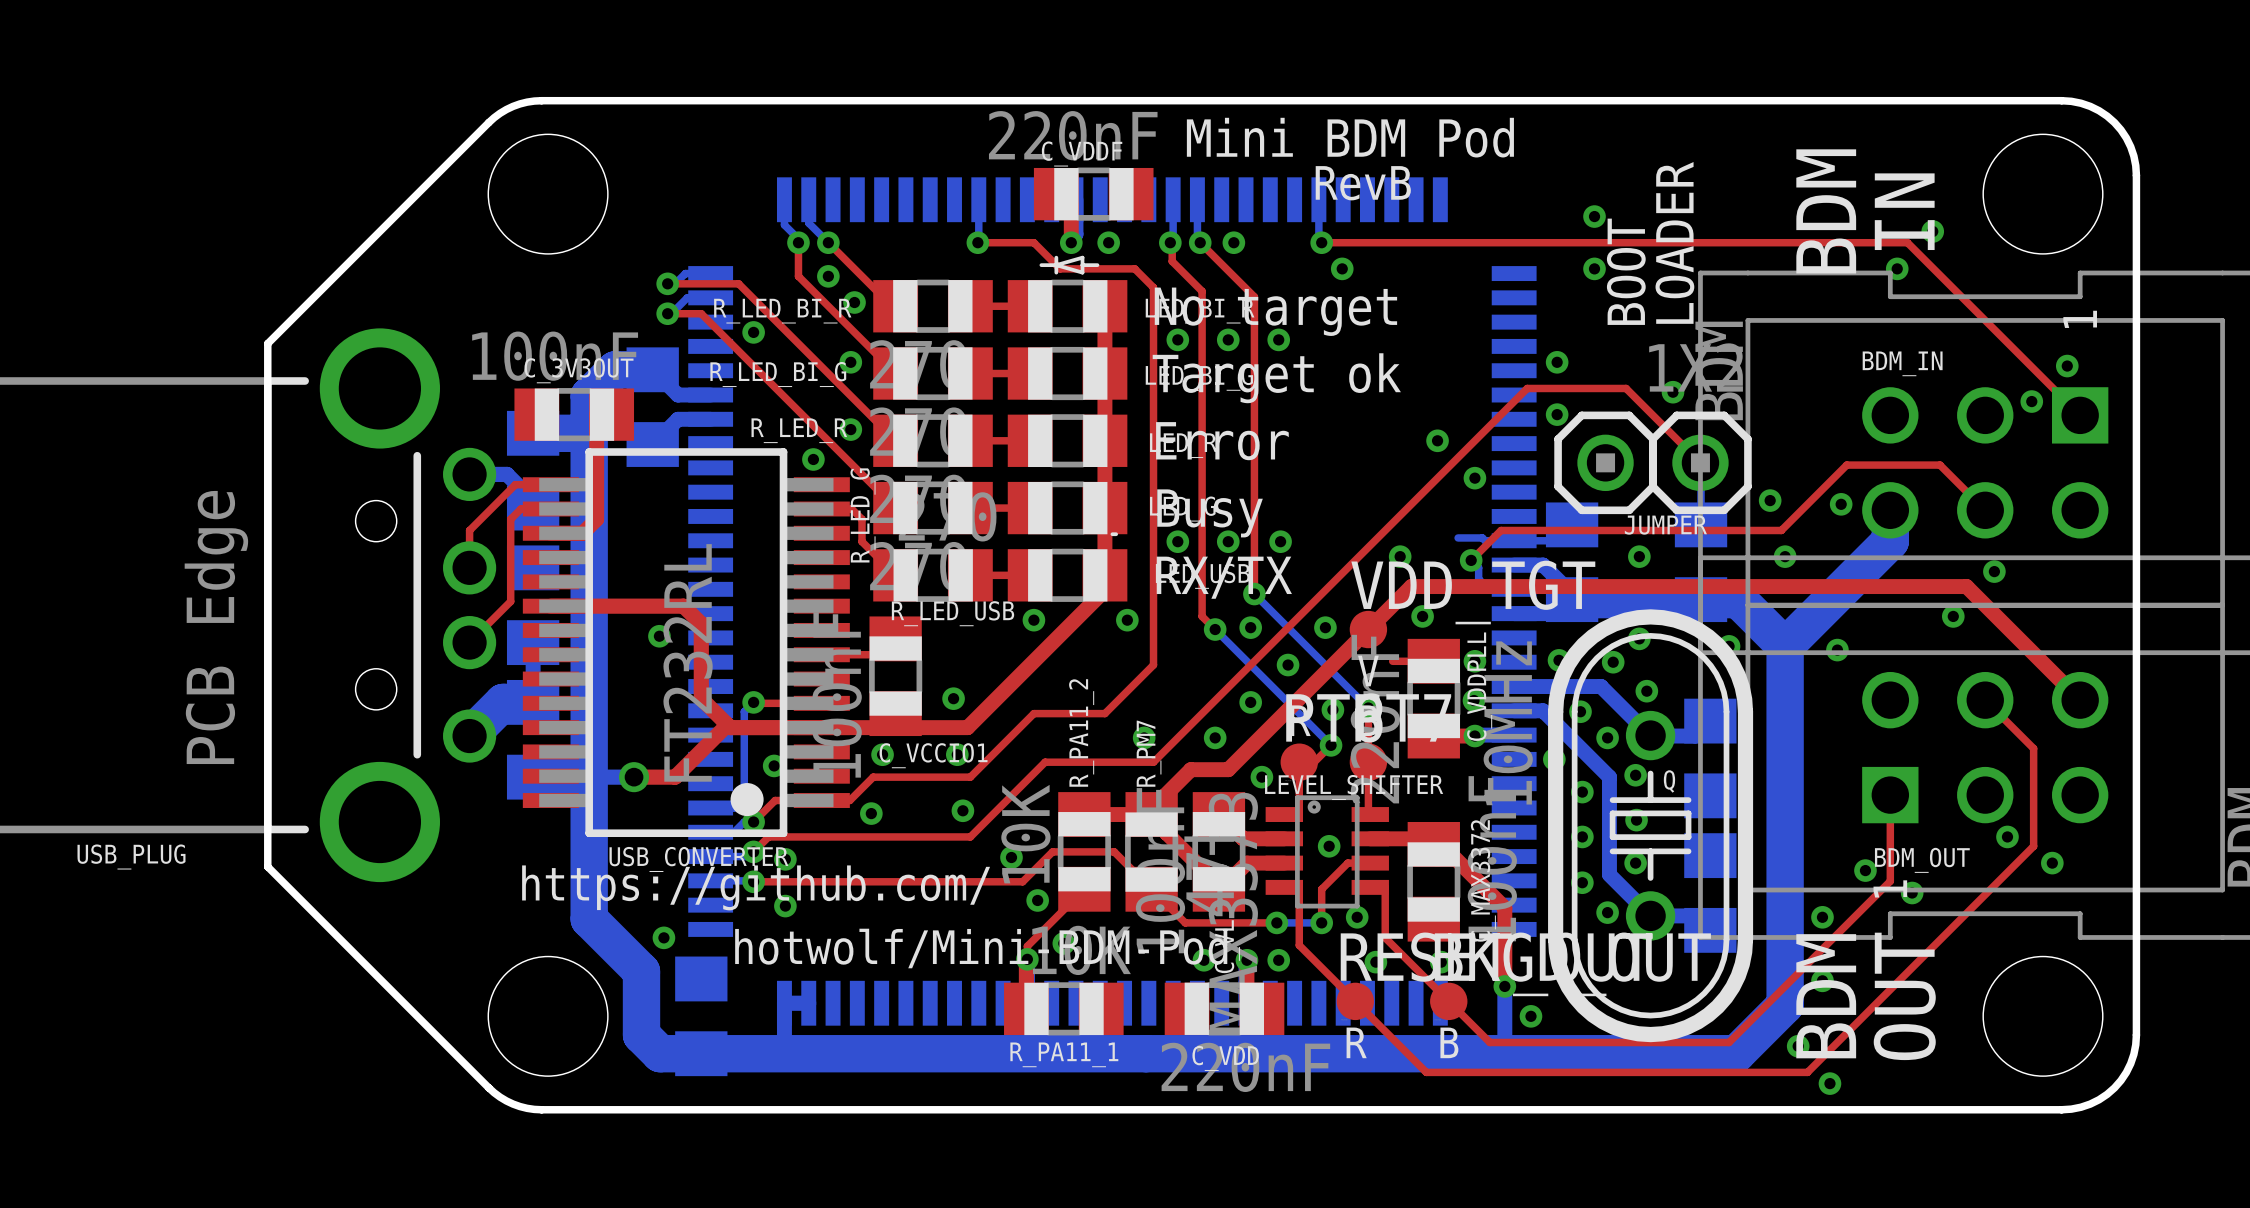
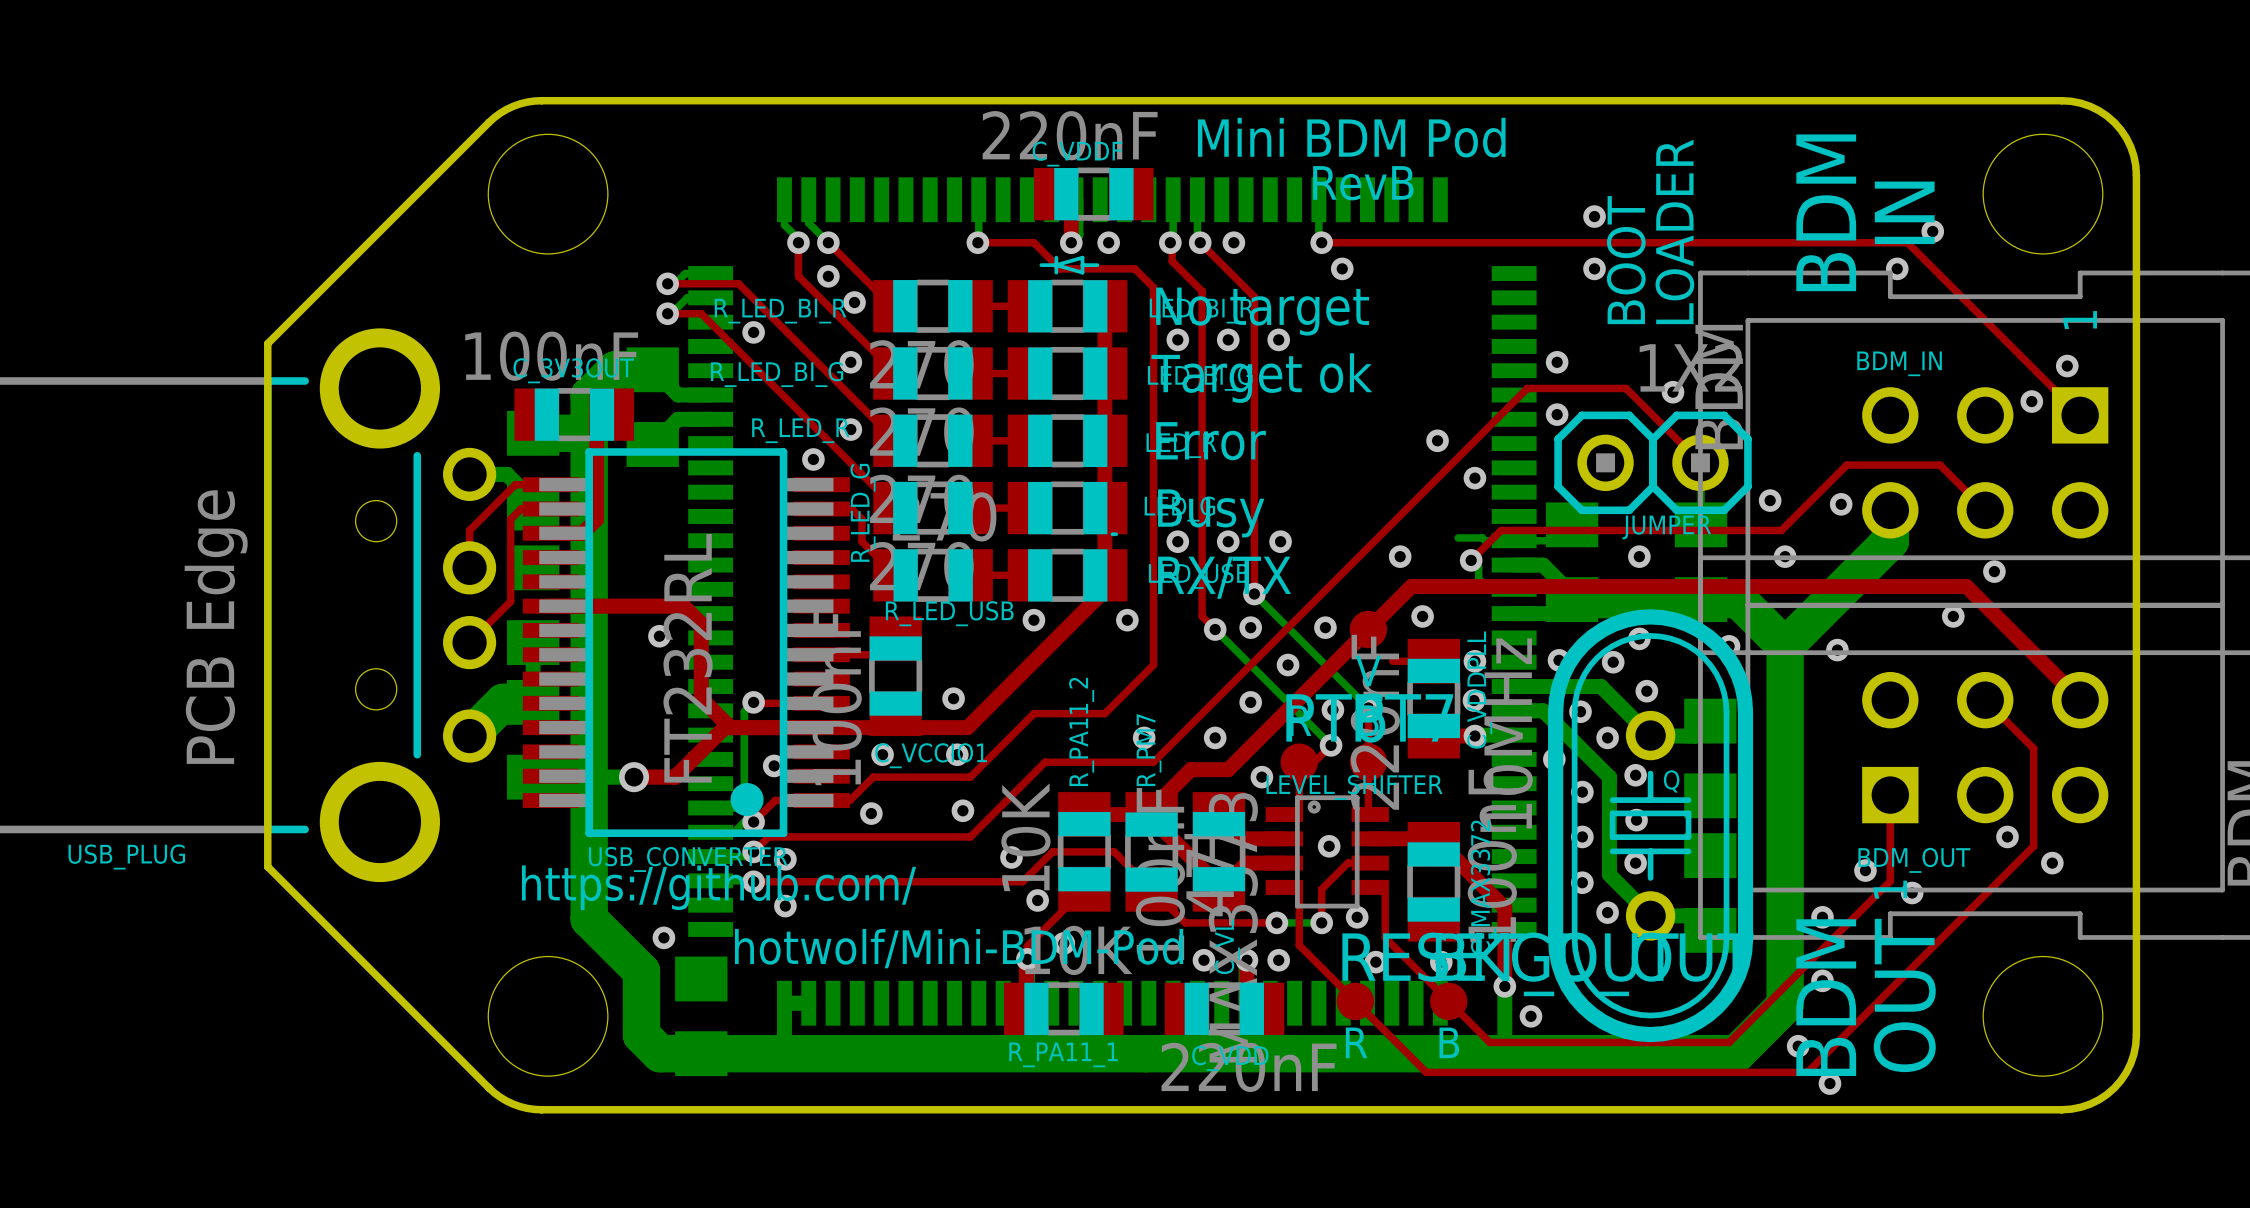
VDD_TGT name: VDD_TGT (1473, 592) -> none

